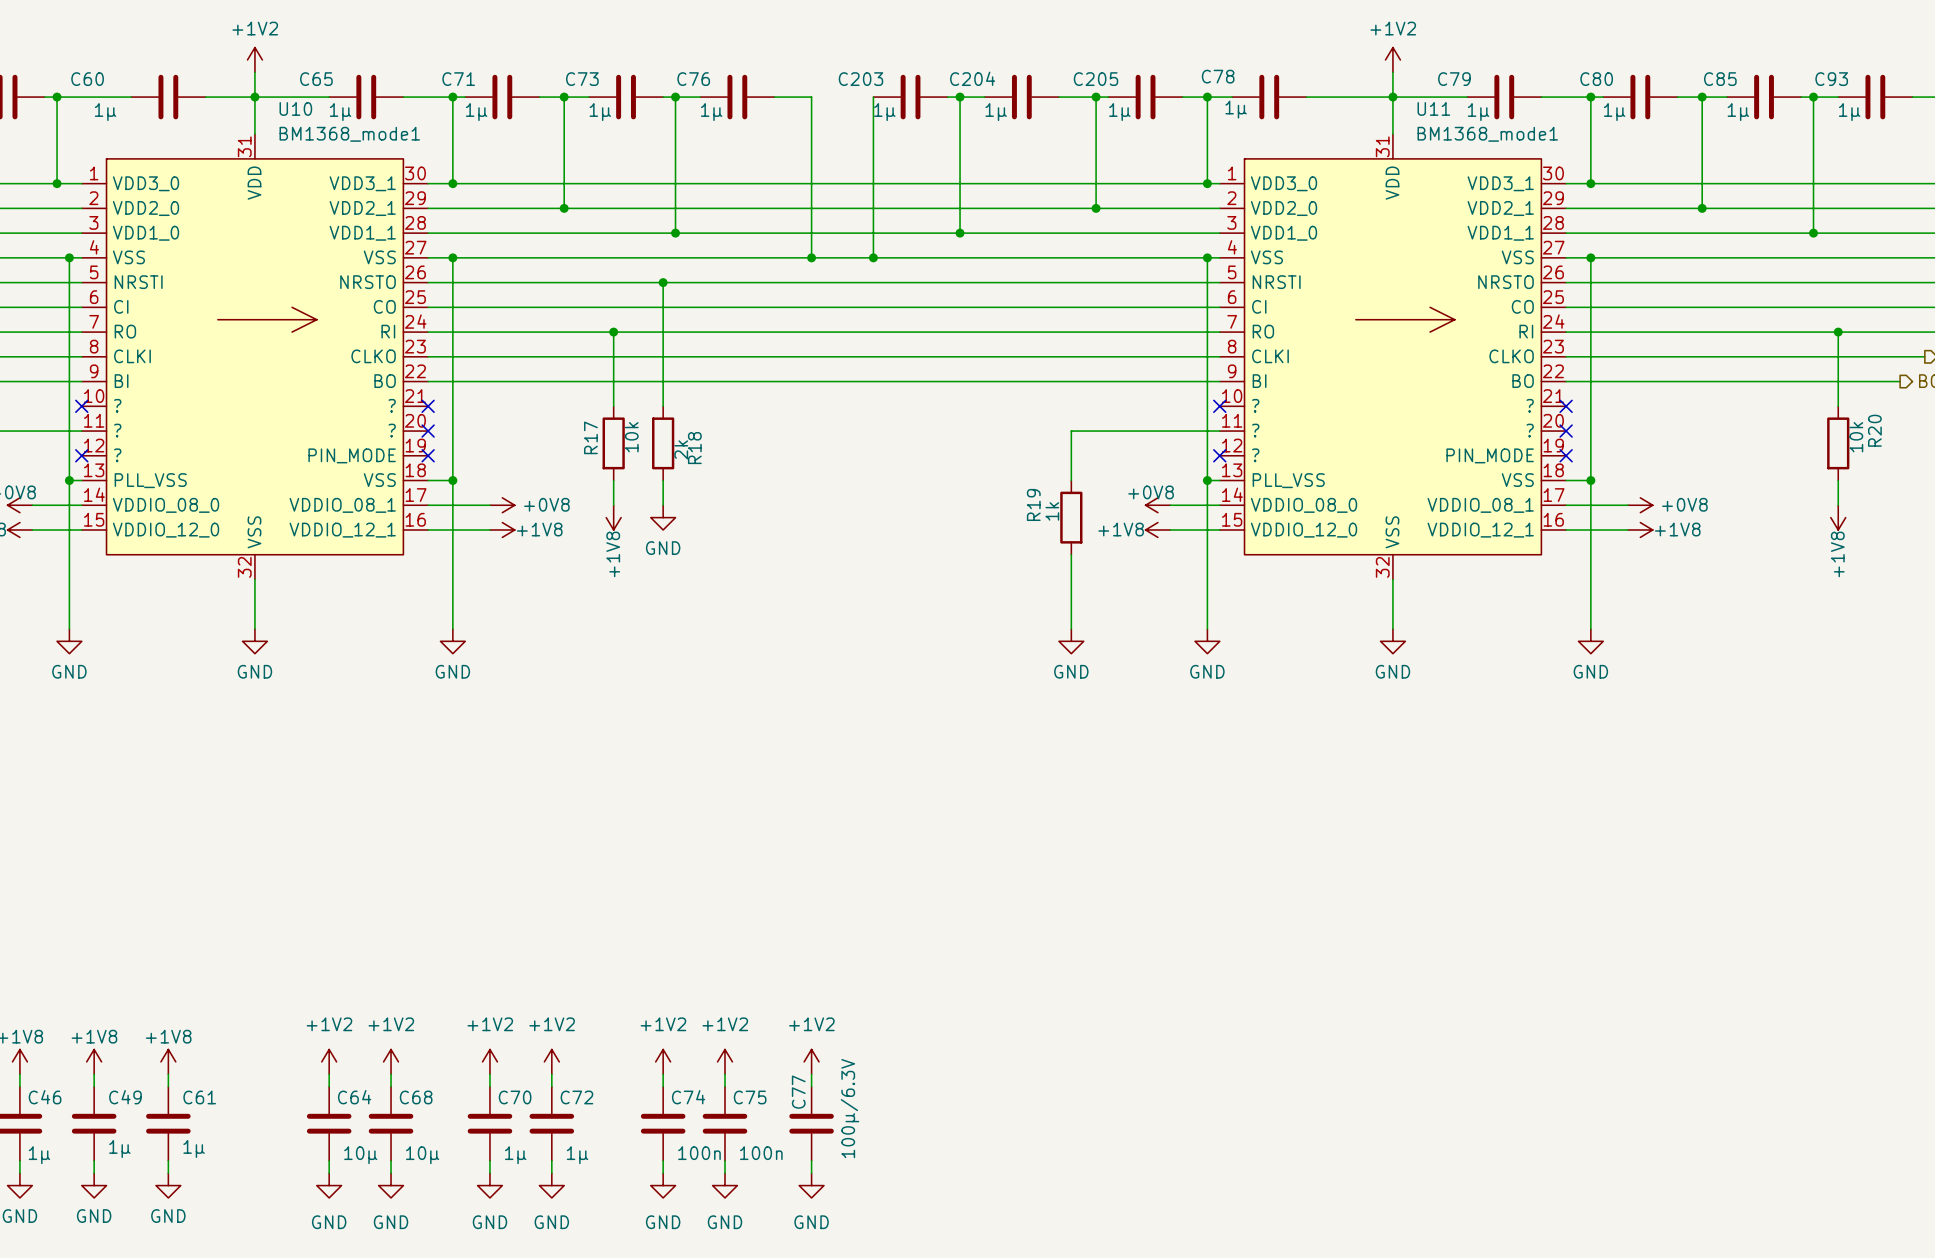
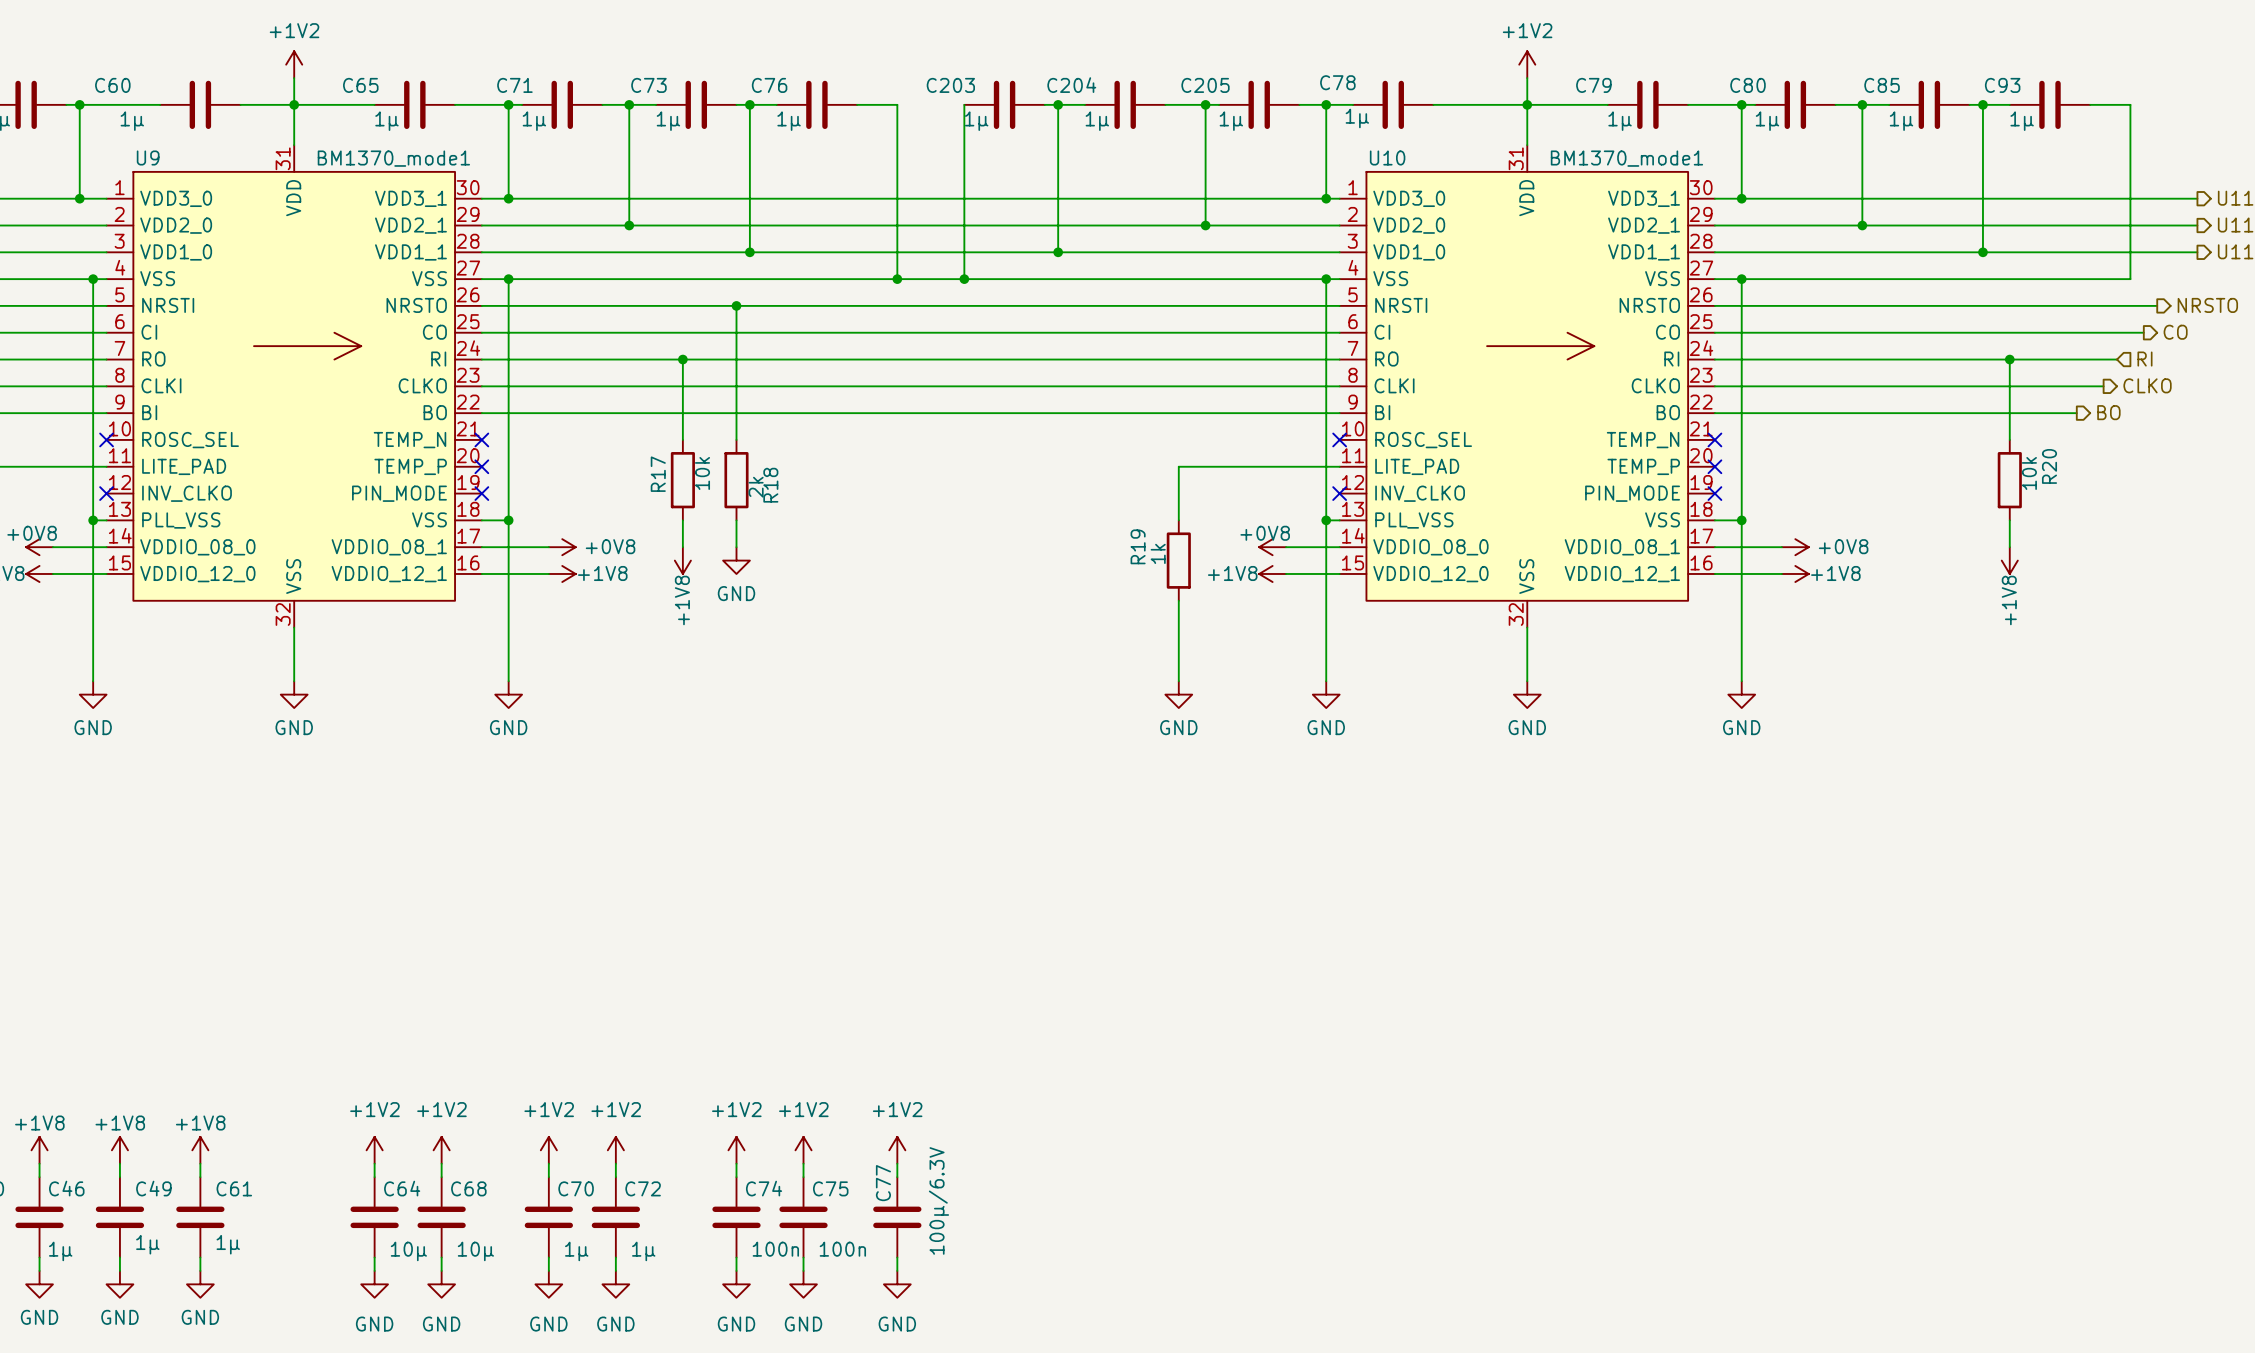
U10 name position: U10 (295, 108) -> U10 (1387, 157)
U10 value: BM1368_mode1 (349, 134) -> BM1370_mode1 (1626, 158)
U10 position: (254, 356) -> (1527, 386)
U9: none -> BM1370_mode1 (294, 386)
U11: BM1368_mode1 (1392, 356) -> none
U10 pin name: ? (117, 405) -> ROSC_SEL (1423, 440)
U10 pin name: ? (392, 405) -> TEMP_N (1643, 440)
U10 pin name: ? (117, 430) -> LITE_PAD (1417, 466)
U10 pin name: ? (392, 430) -> TEMP_P (1643, 466)
U10 pin name: ? (117, 455) -> INV_CLKO (1420, 493)

